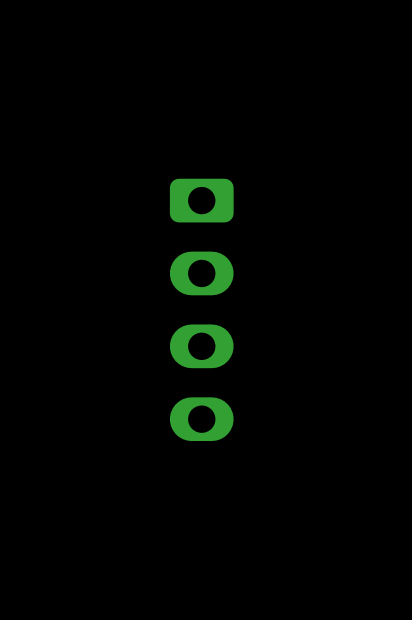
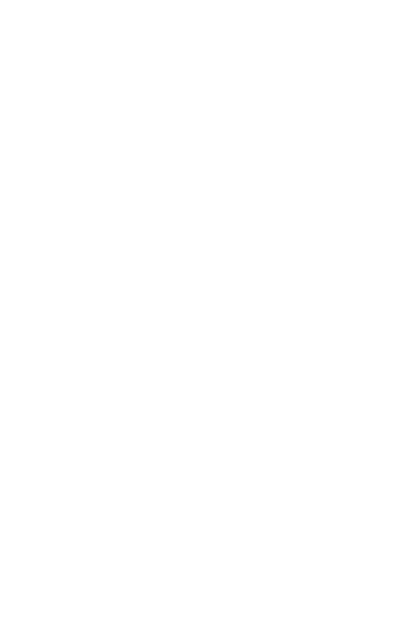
part: (201, 309) -> none

